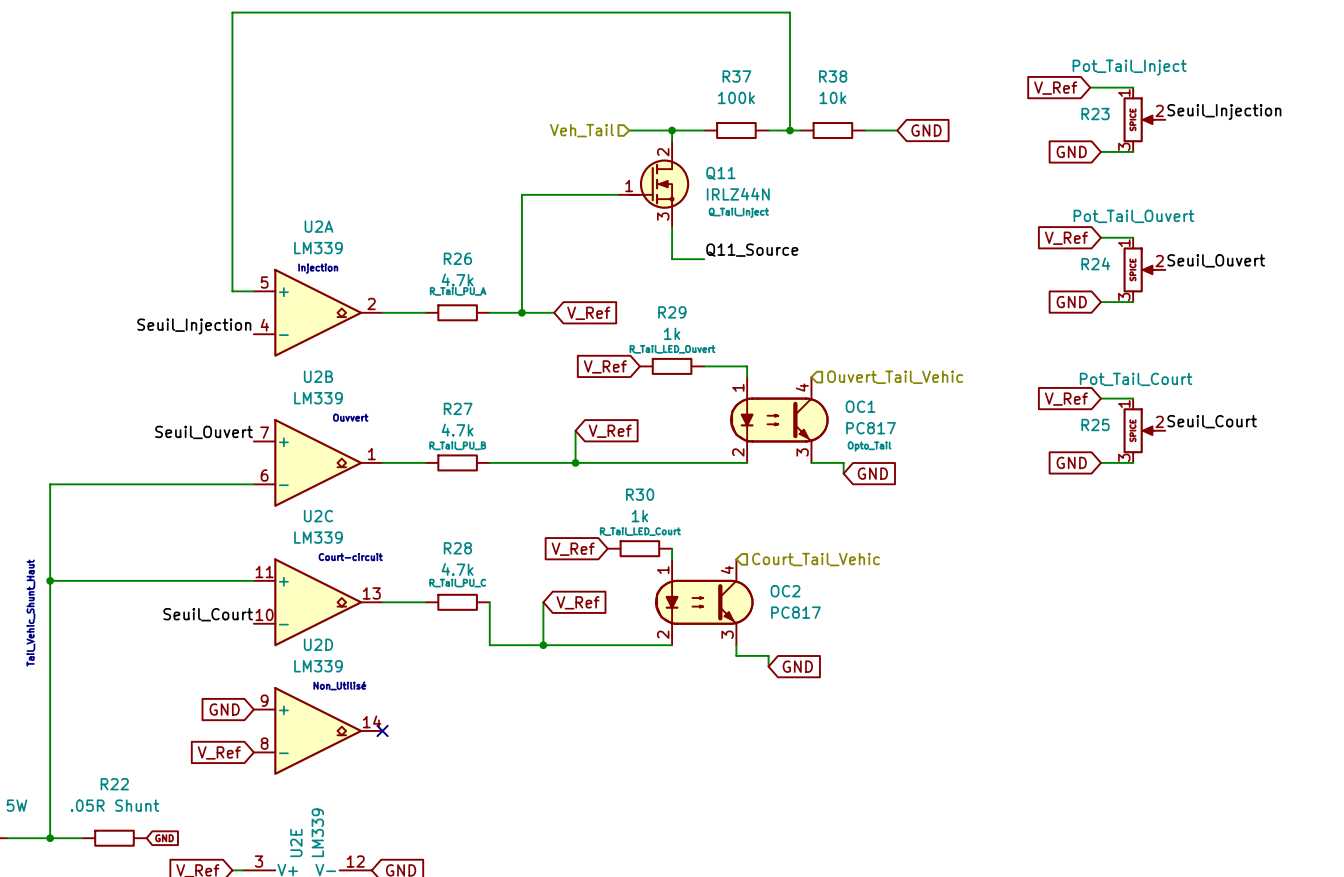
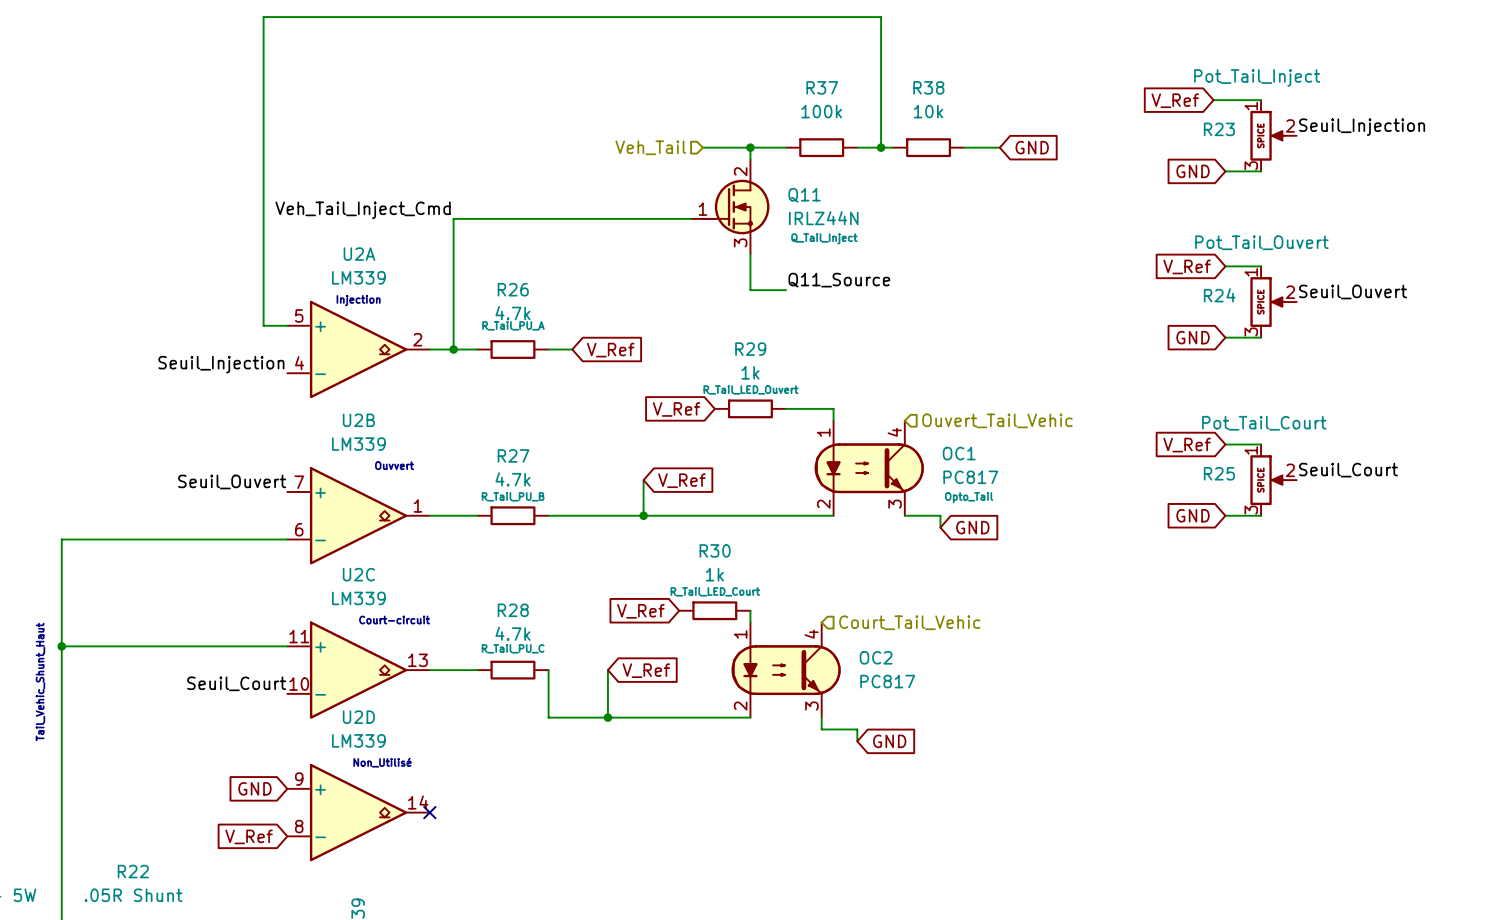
label: none -> Veh_Tail_Inject_Cmd (363, 210)
wire: (521, 194) (521, 312) -> (584, 218) (453, 218) (453, 349)
junction: none -> (453, 349)
wire: (511, 312) (554, 312) -> none
junction: (521, 312) -> none
global label position: V_Ref (588, 313) -> V_Ref (610, 350)

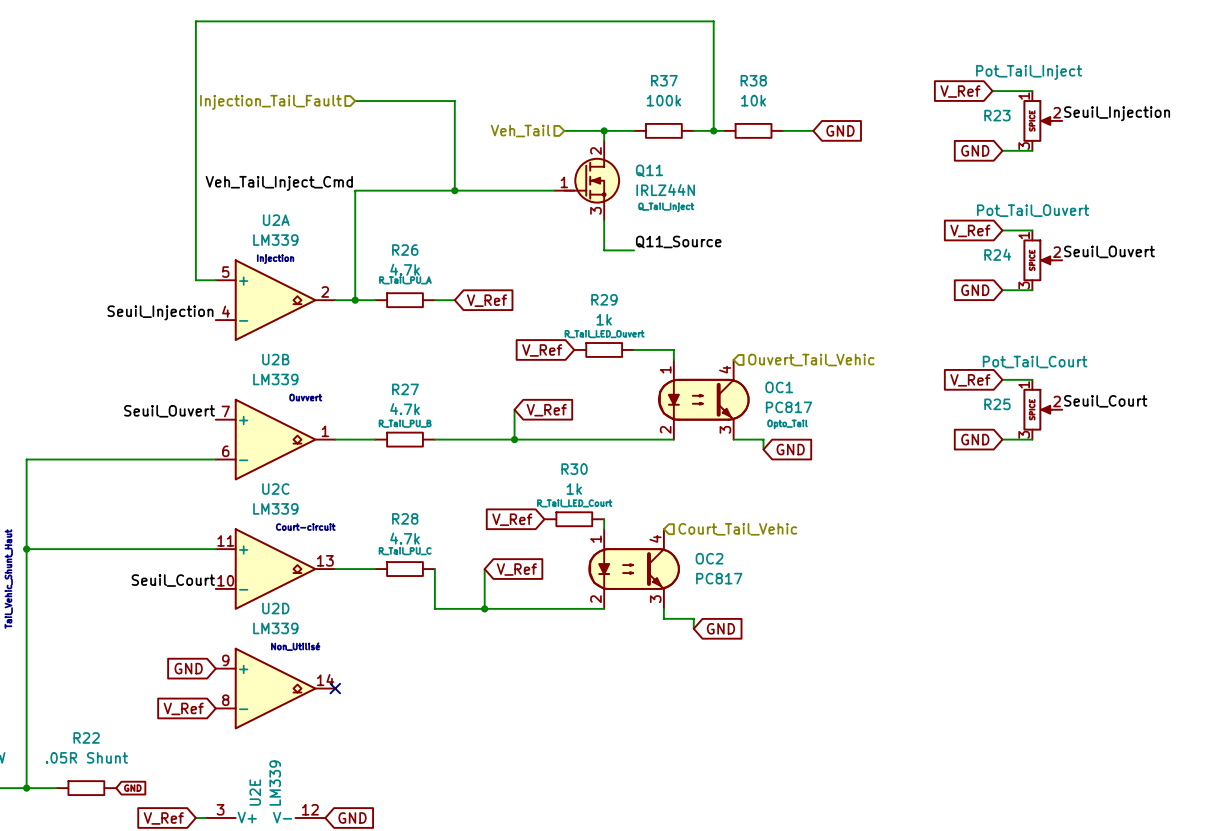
wire: none -> (355, 101) (454, 101) (454, 190)
hierarchical label: none -> Injection_Tail_Fault (270, 102)
junction: none -> (454, 190)

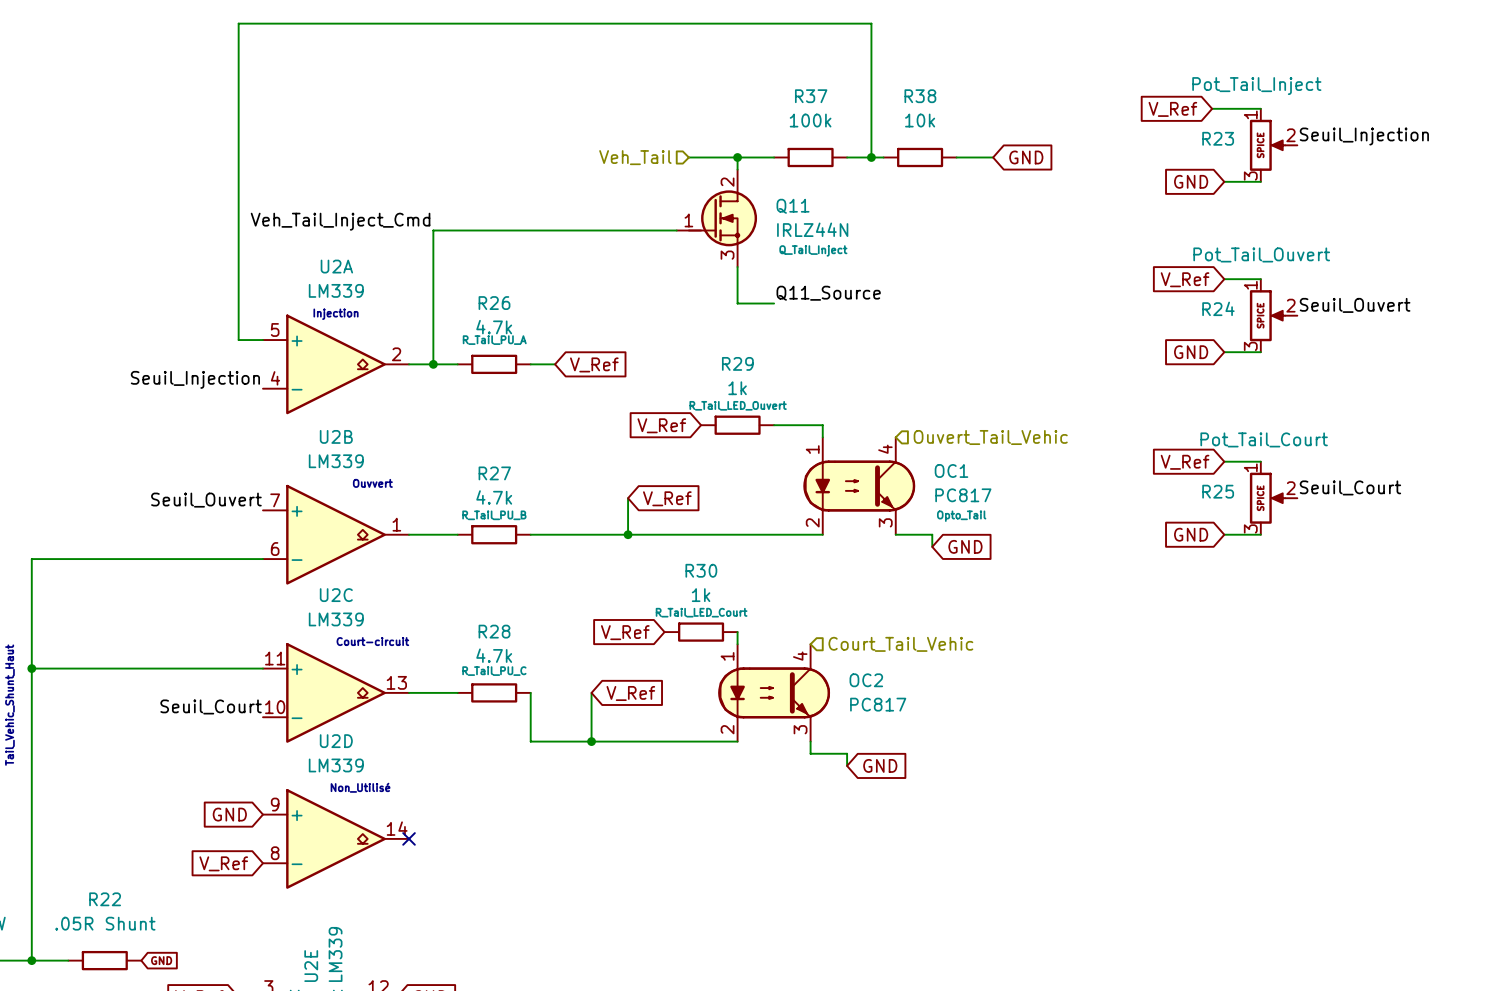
wire: (355, 101) (454, 101) (454, 190) -> none
hierarchical label: Injection_Tail_Fault (270, 102) -> none
junction: (454, 190) -> none

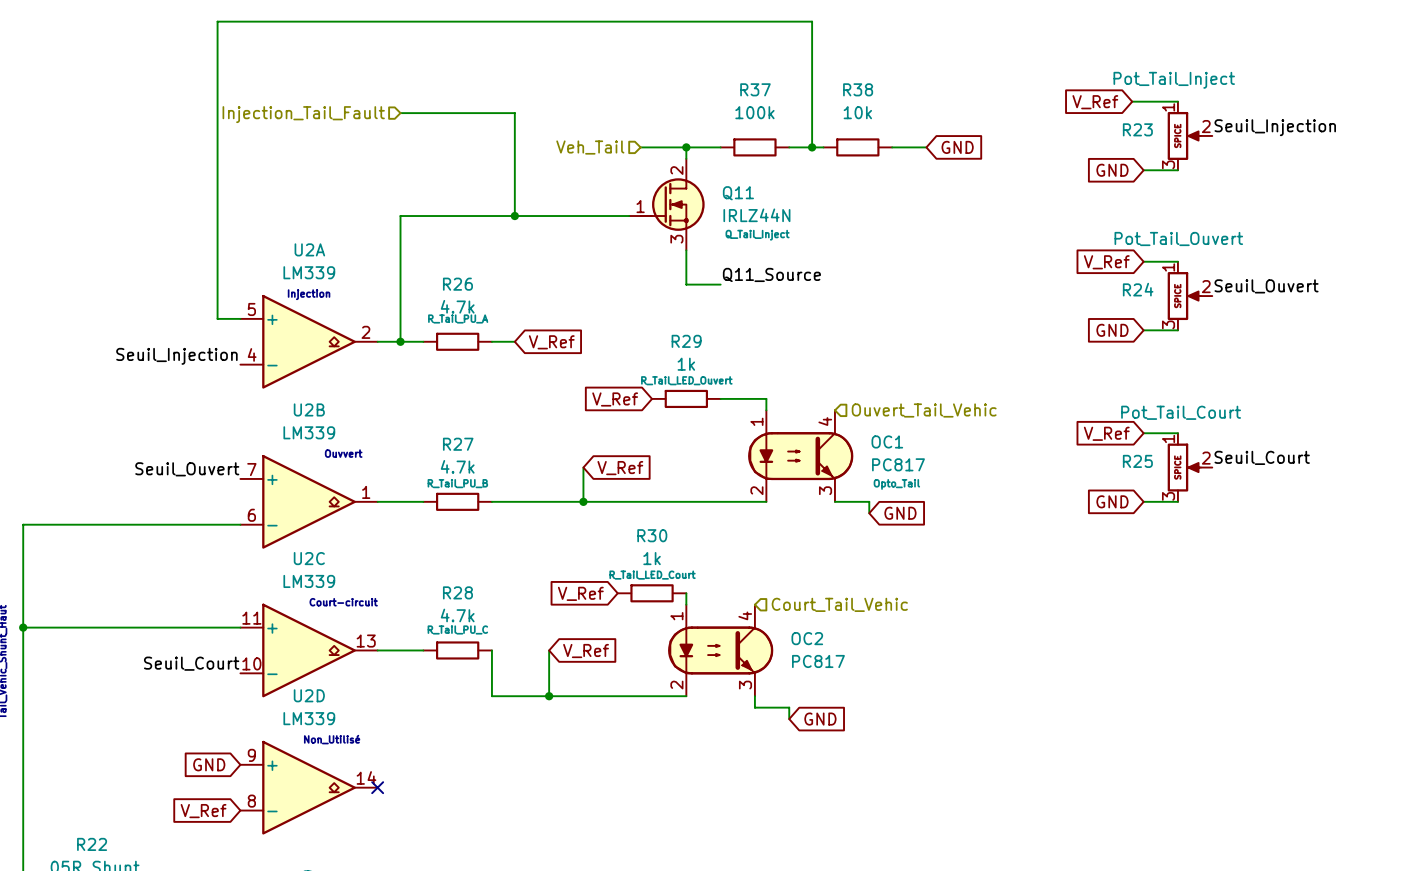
wire: none -> (400, 113) (514, 113) (514, 216)
hierarchical label: none -> Injection_Tail_Fault (303, 114)
label: Veh_Tail_Inject_Cmd (340, 221) -> none
junction: none -> (514, 216)

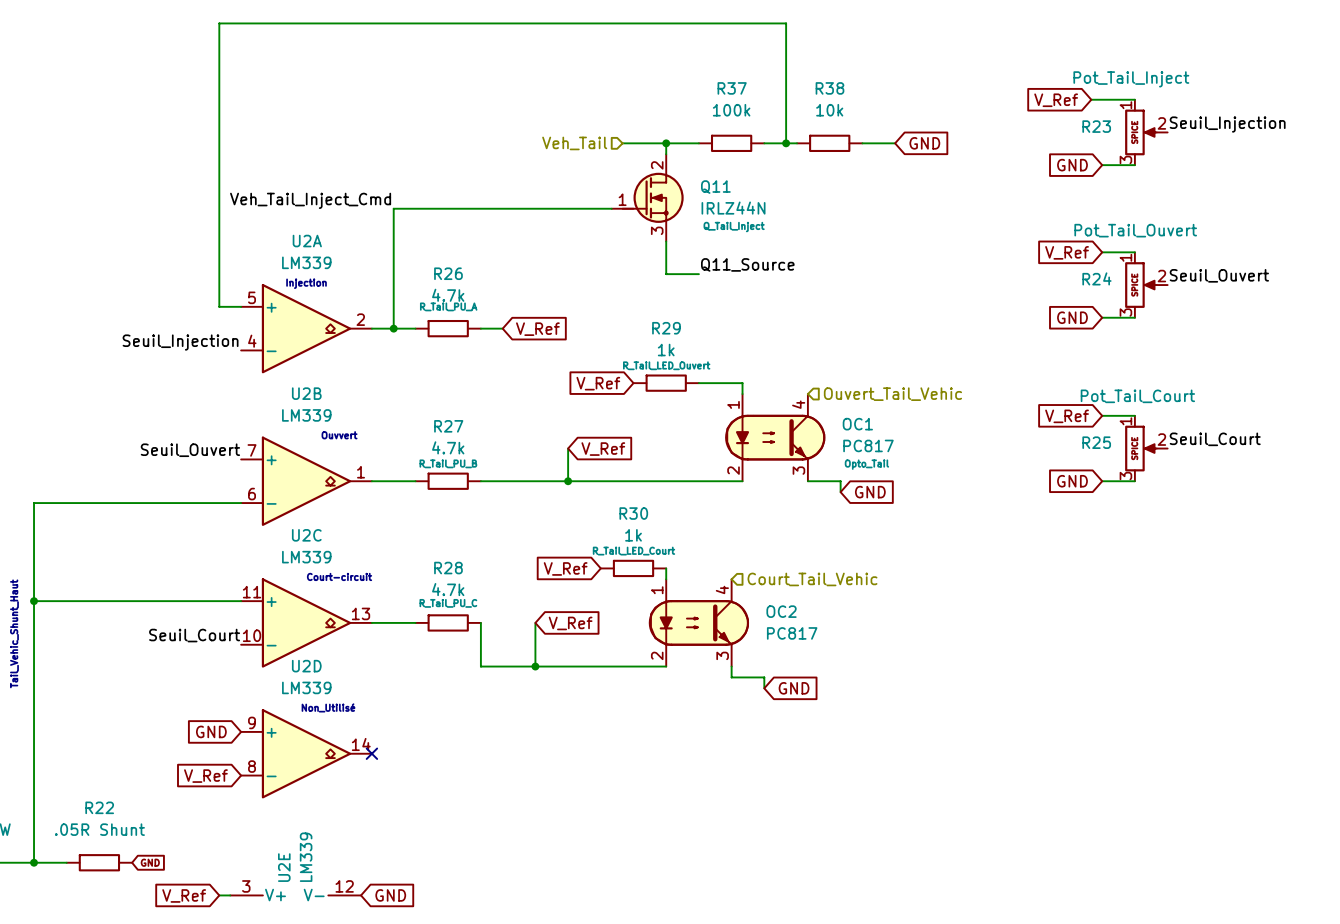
wire: (400, 113) (514, 113) (514, 216) -> none
hierarchical label: Injection_Tail_Fault (303, 114) -> none
label: none -> Veh_Tail_Inject_Cmd (310, 200)
junction: (514, 216) -> none

